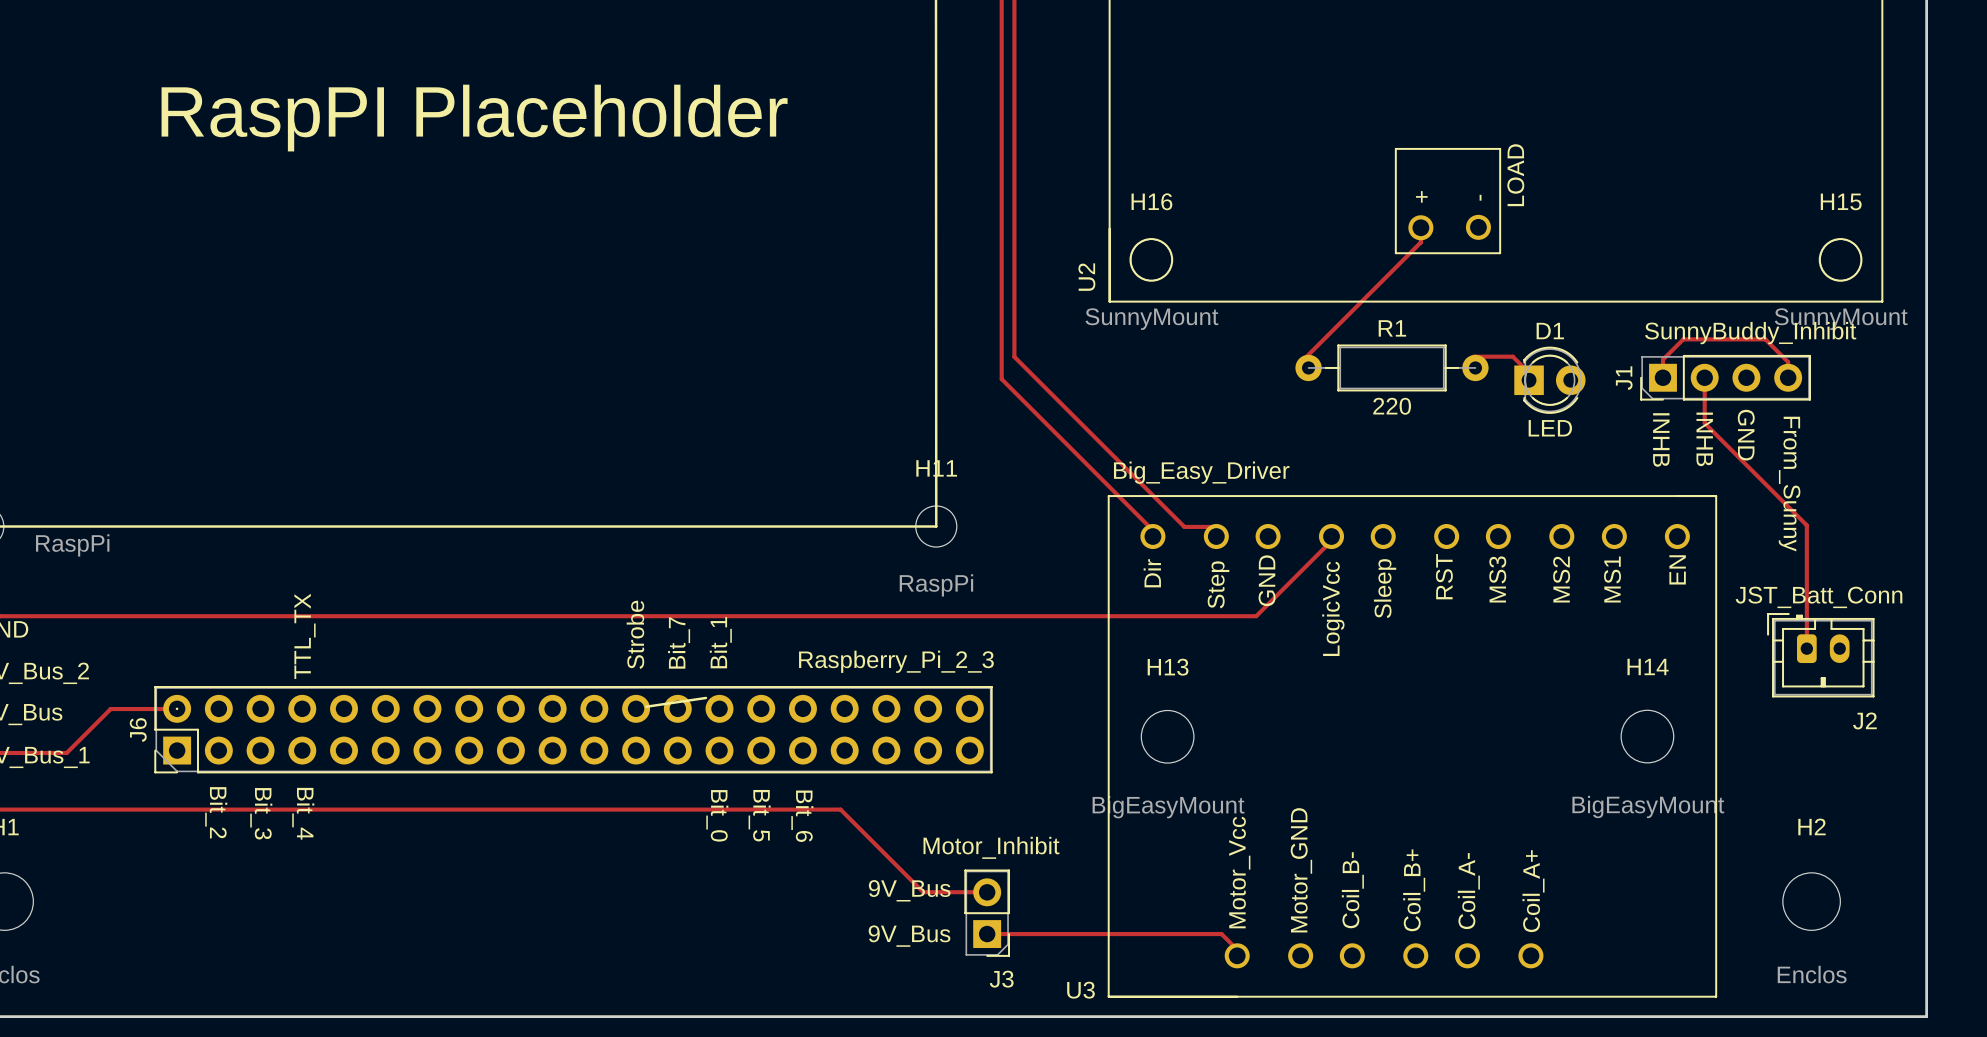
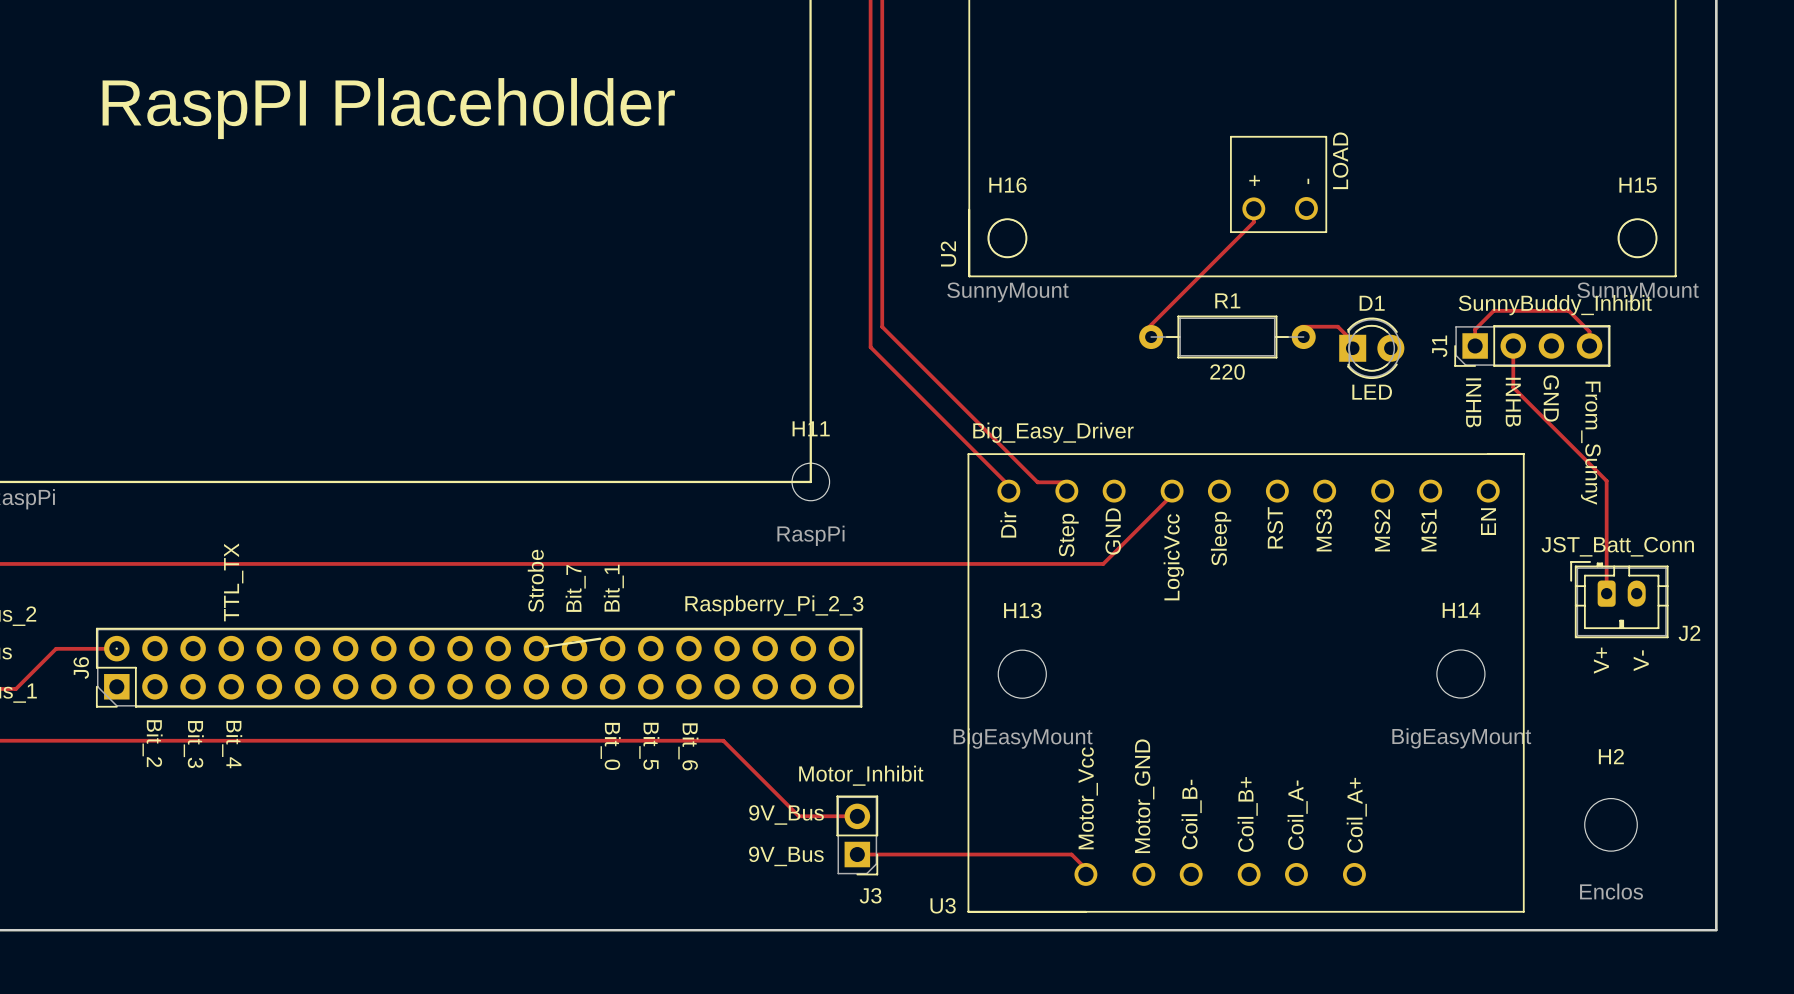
J2 name position: J2 (1864, 720) -> J2 (1689, 633)
text: none -> V+ (1601, 660)
text: none -> V- (1641, 660)

